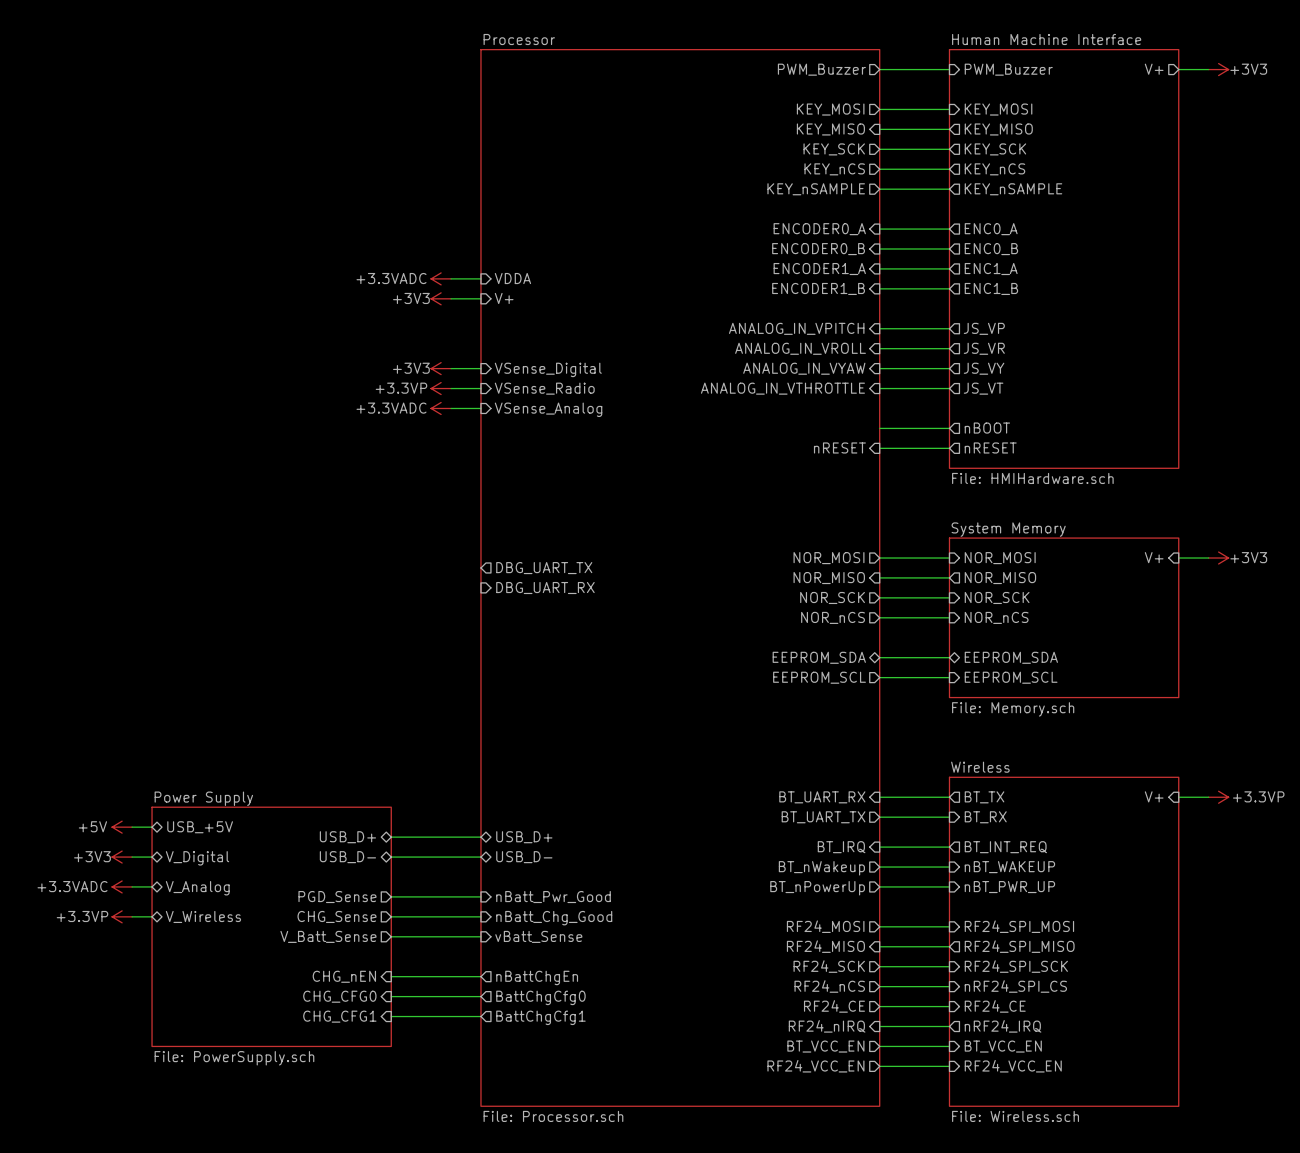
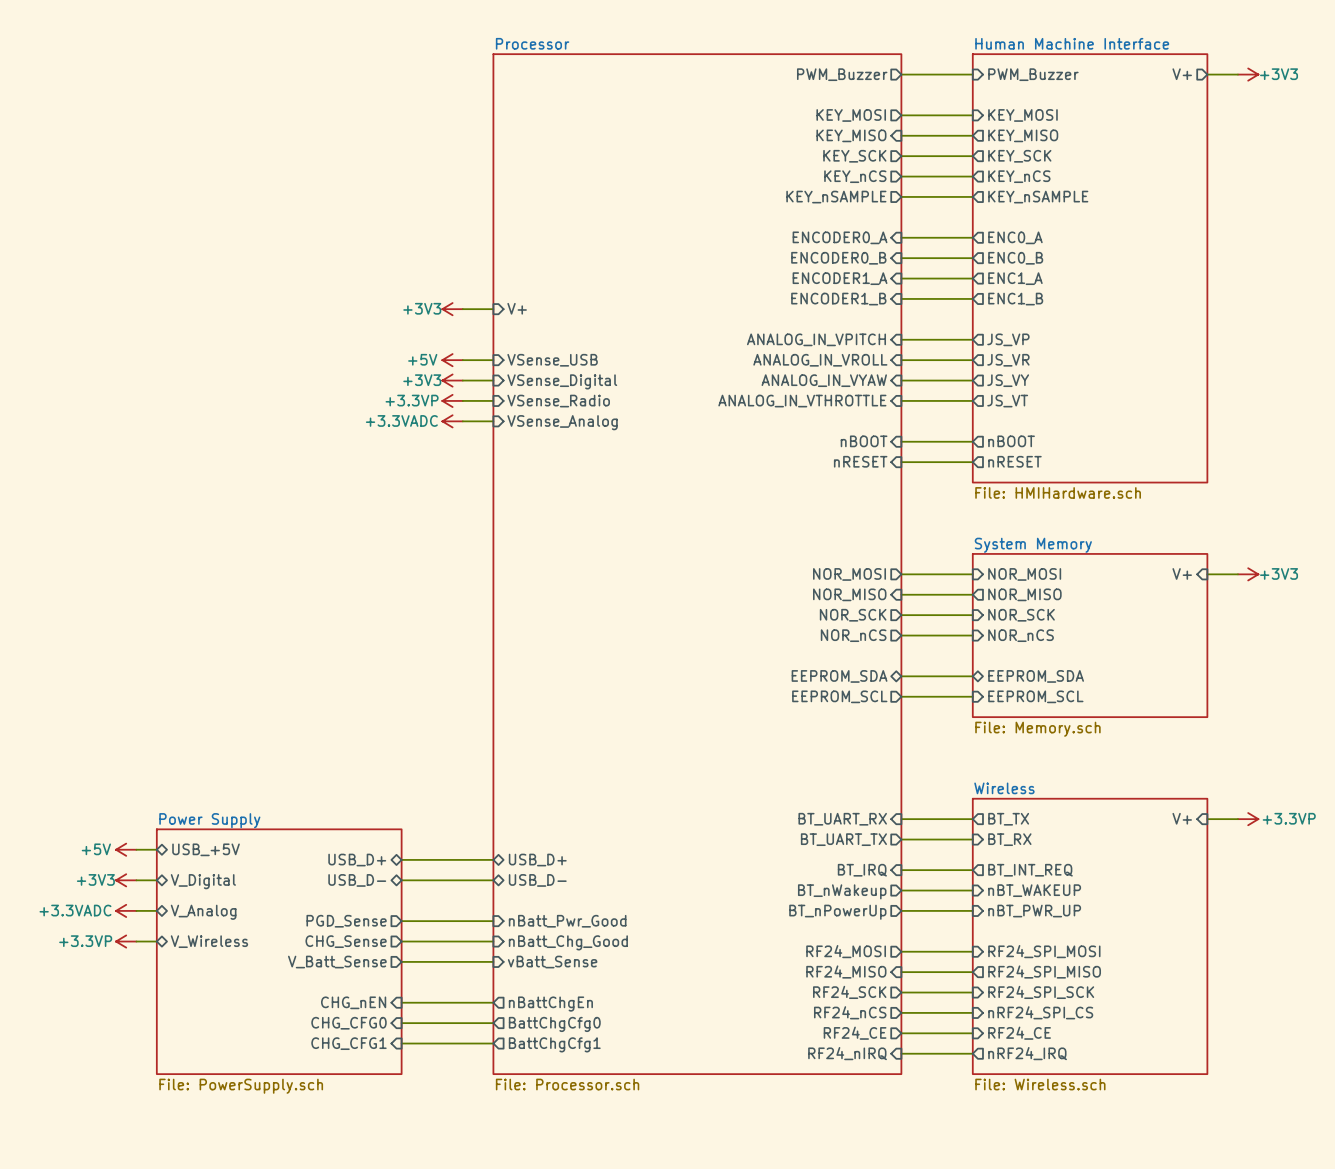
power symbol: +3.3VADC (441, 278) -> none
wire: (451, 278) (480, 278) -> (462, 360) (493, 360)
sheet pin: VDDA (512, 278) -> none
power symbol: none -> +5V (452, 360)
sheet pin: none -> VSense_USB (552, 360)
sheet pin: none -> nBOOT (864, 441)
sheet Processor: none -> File: Processor.sch (697, 564)
sheet pin: DBG_UART_TX (544, 568) -> none
sheet Processor: File: Processor.sch (680, 577) -> none
sheet pin: DBG_UART_RX (545, 588) -> none
sheet Wireless: none -> File: Wireless.sch (1090, 936)
sheet Wireless: File: Wireless.sch (1064, 941) -> none
sheet pin: BT_VCC_EN (825, 1046) -> none
wire: (879, 1046) (949, 1046) -> none
sheet pin: BT_VCC_EN (1003, 1046) -> none
sheet pin: RF24_VCC_EN (815, 1066) -> none
wire: (879, 1066) (949, 1066) -> none
sheet pin: RF24_VCC_EN (1013, 1066) -> none

